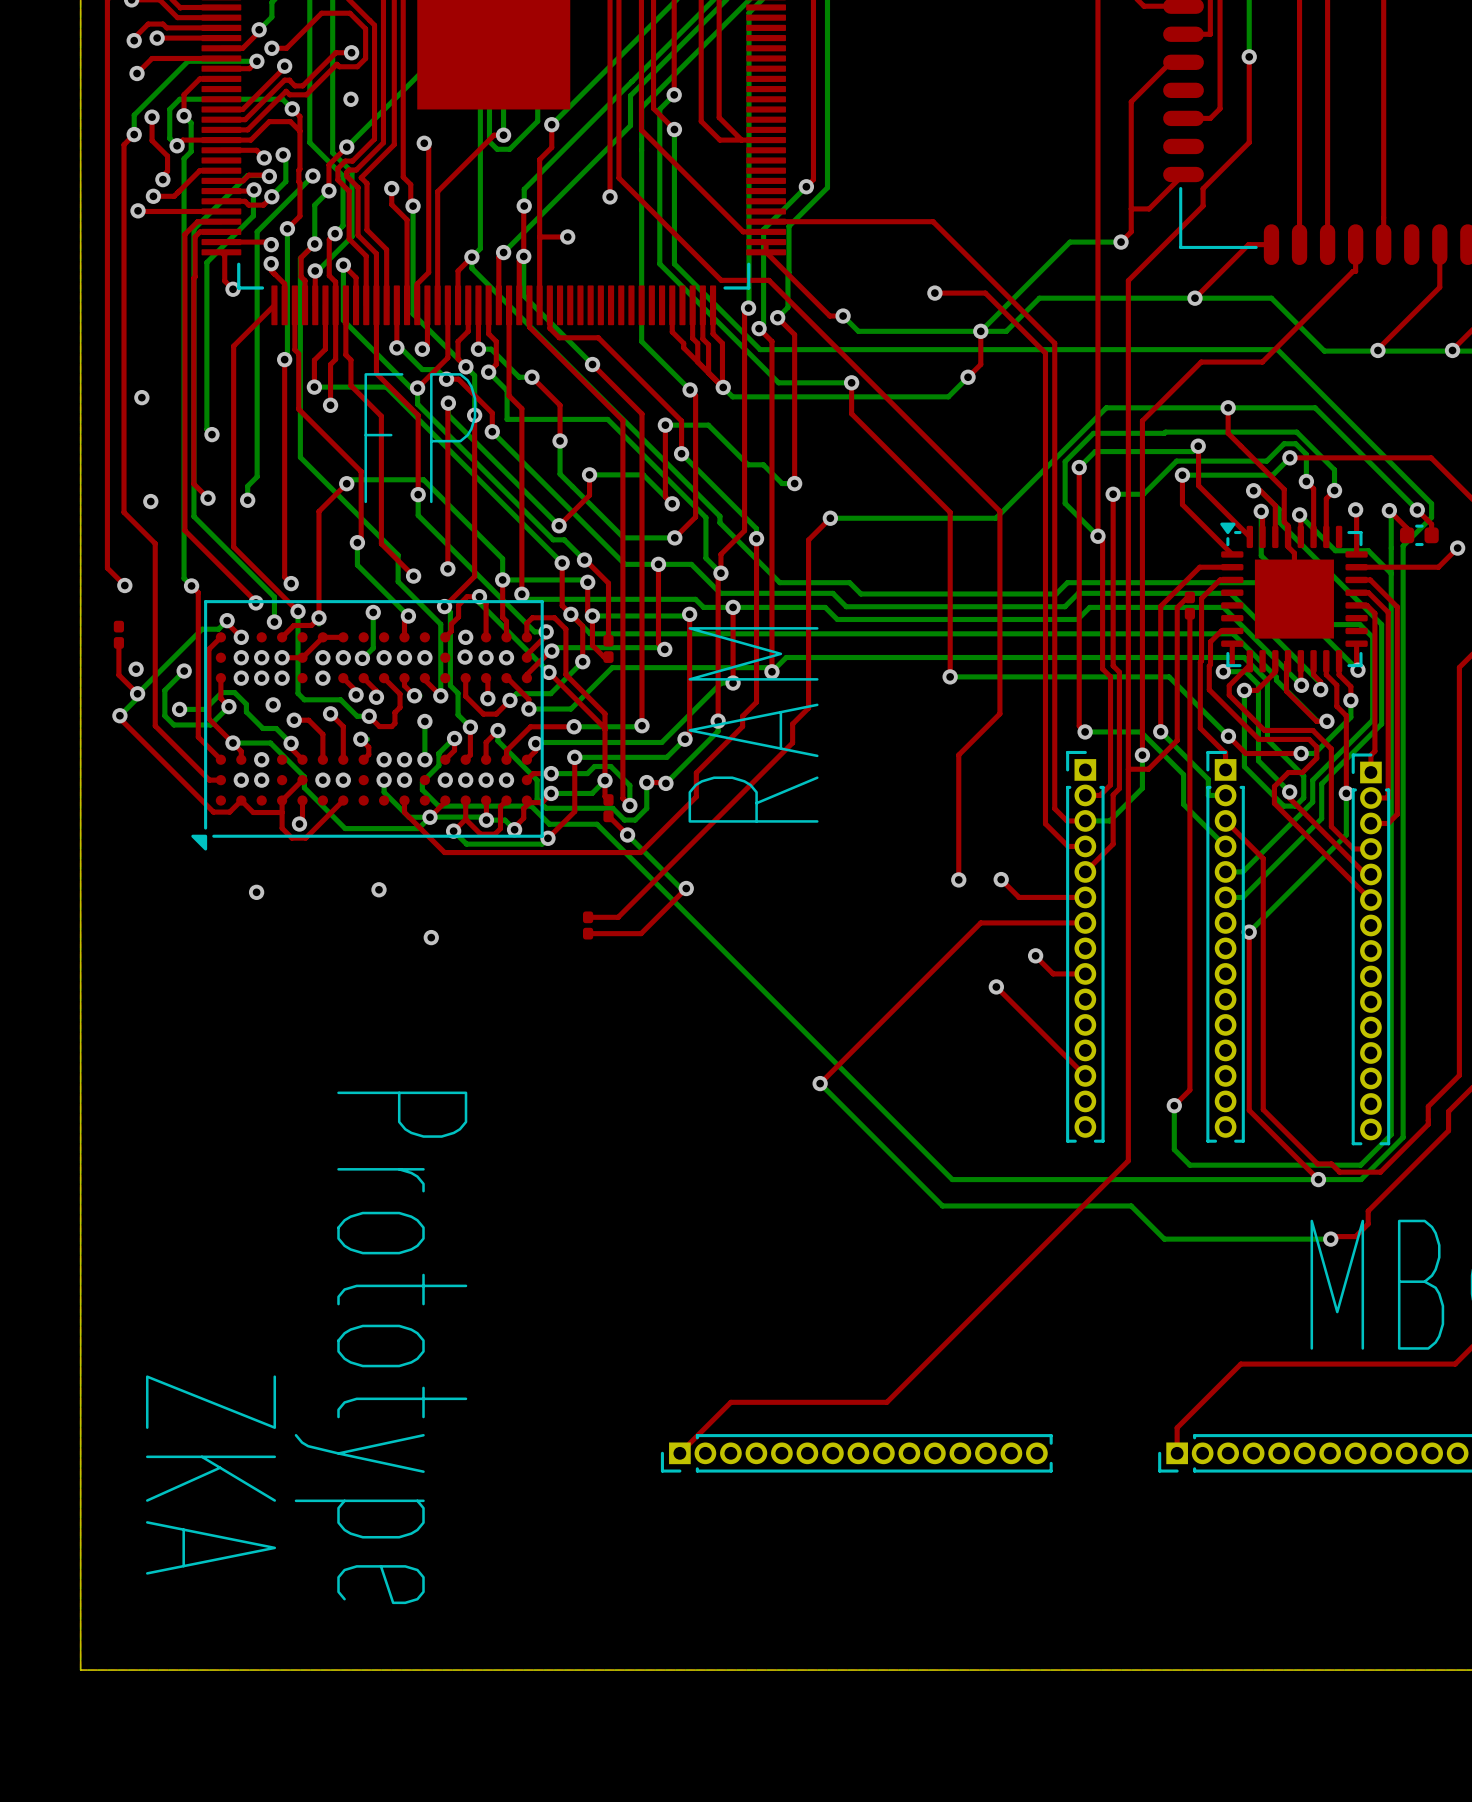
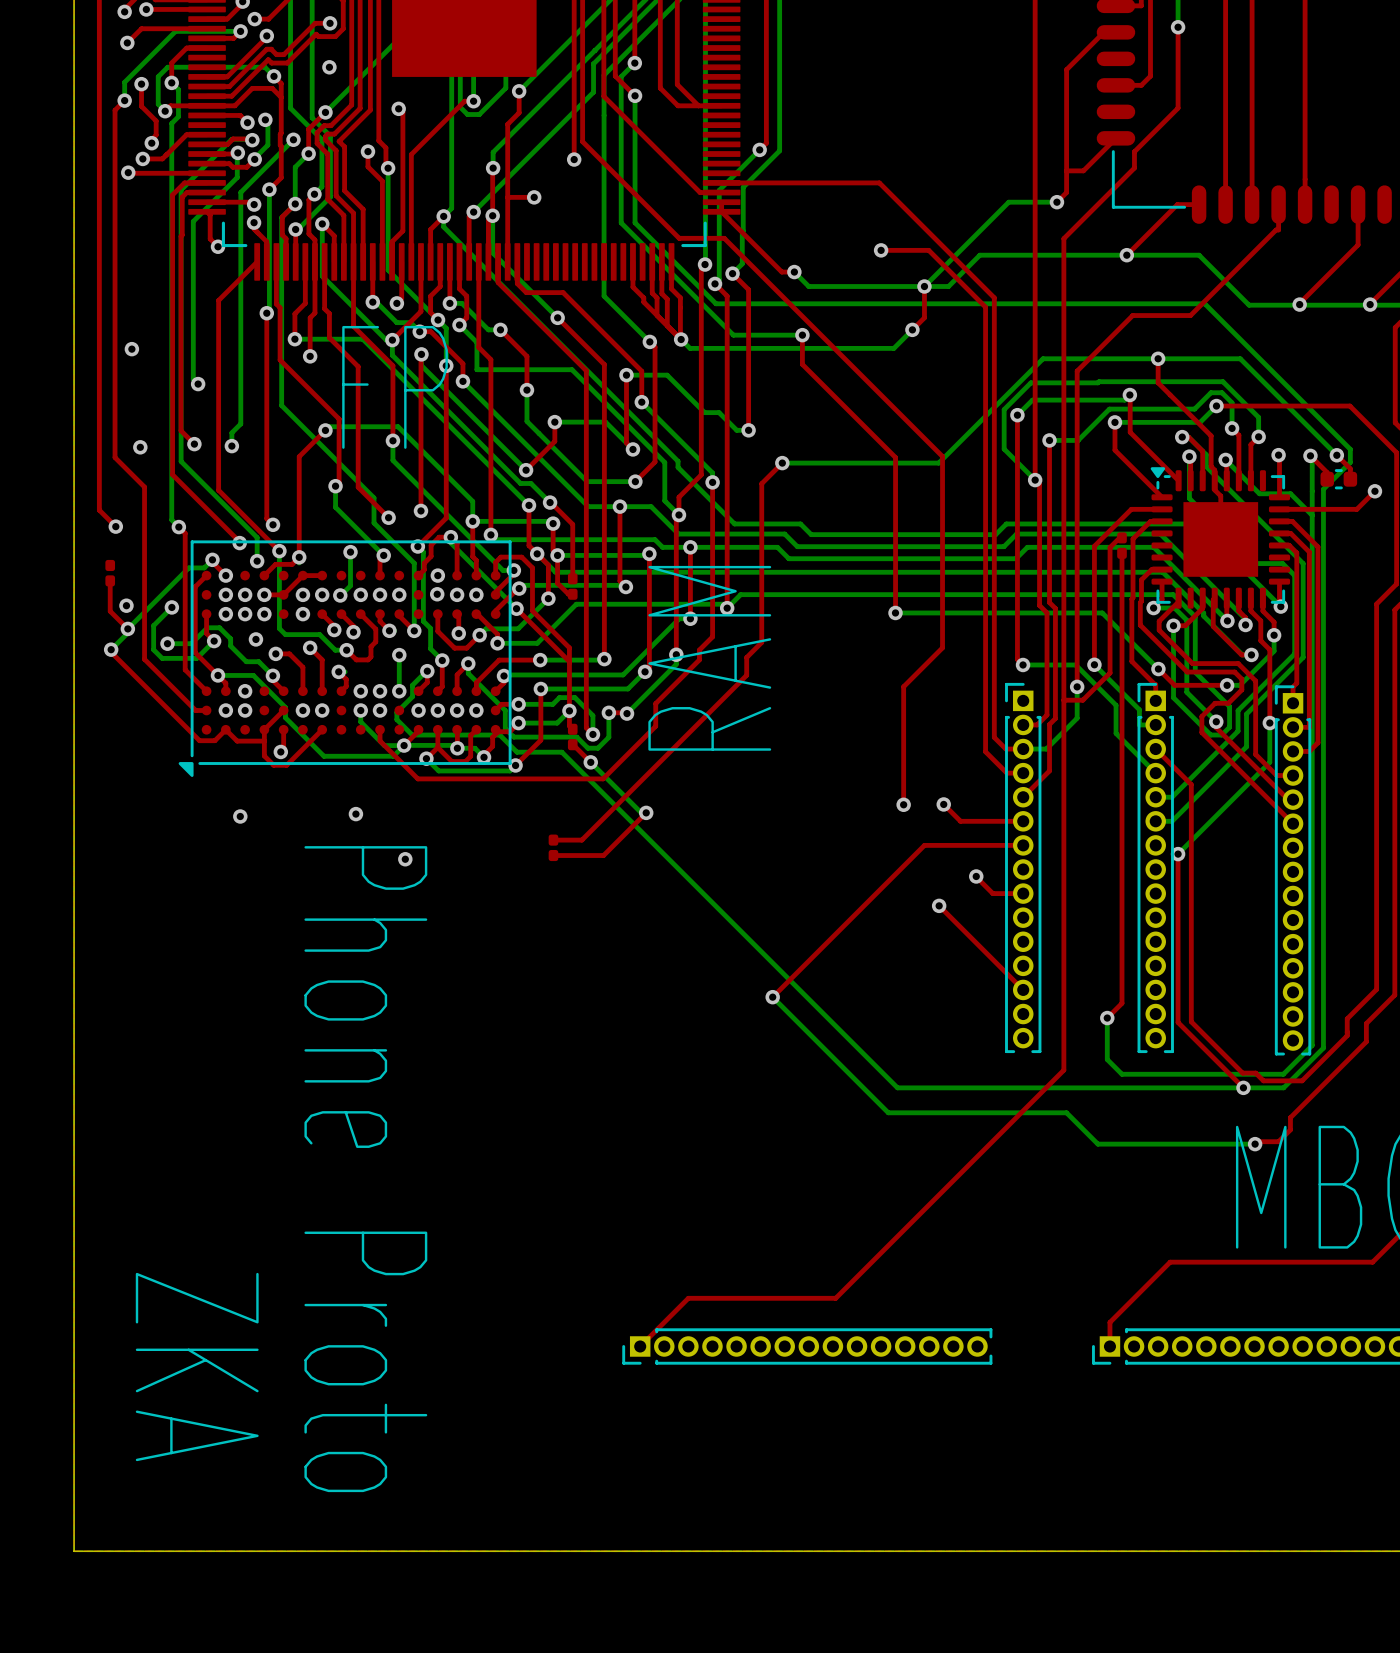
text: none -> Phone Proto (365, 1169)
text: Prototype (381, 1347) -> none

